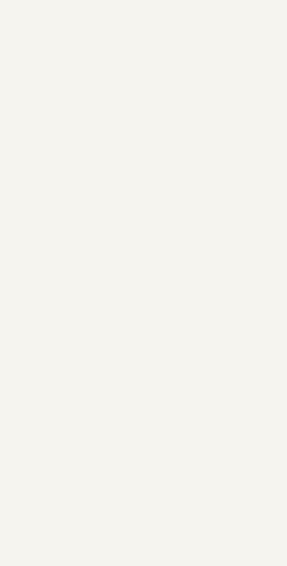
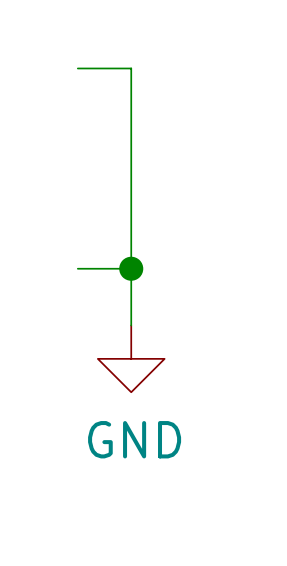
wire: none -> (77, 68) (131, 68) (131, 325)
wire: none -> (77, 268) (131, 268)
junction: none -> (131, 268)
power symbol: none -> GND (131, 358)

